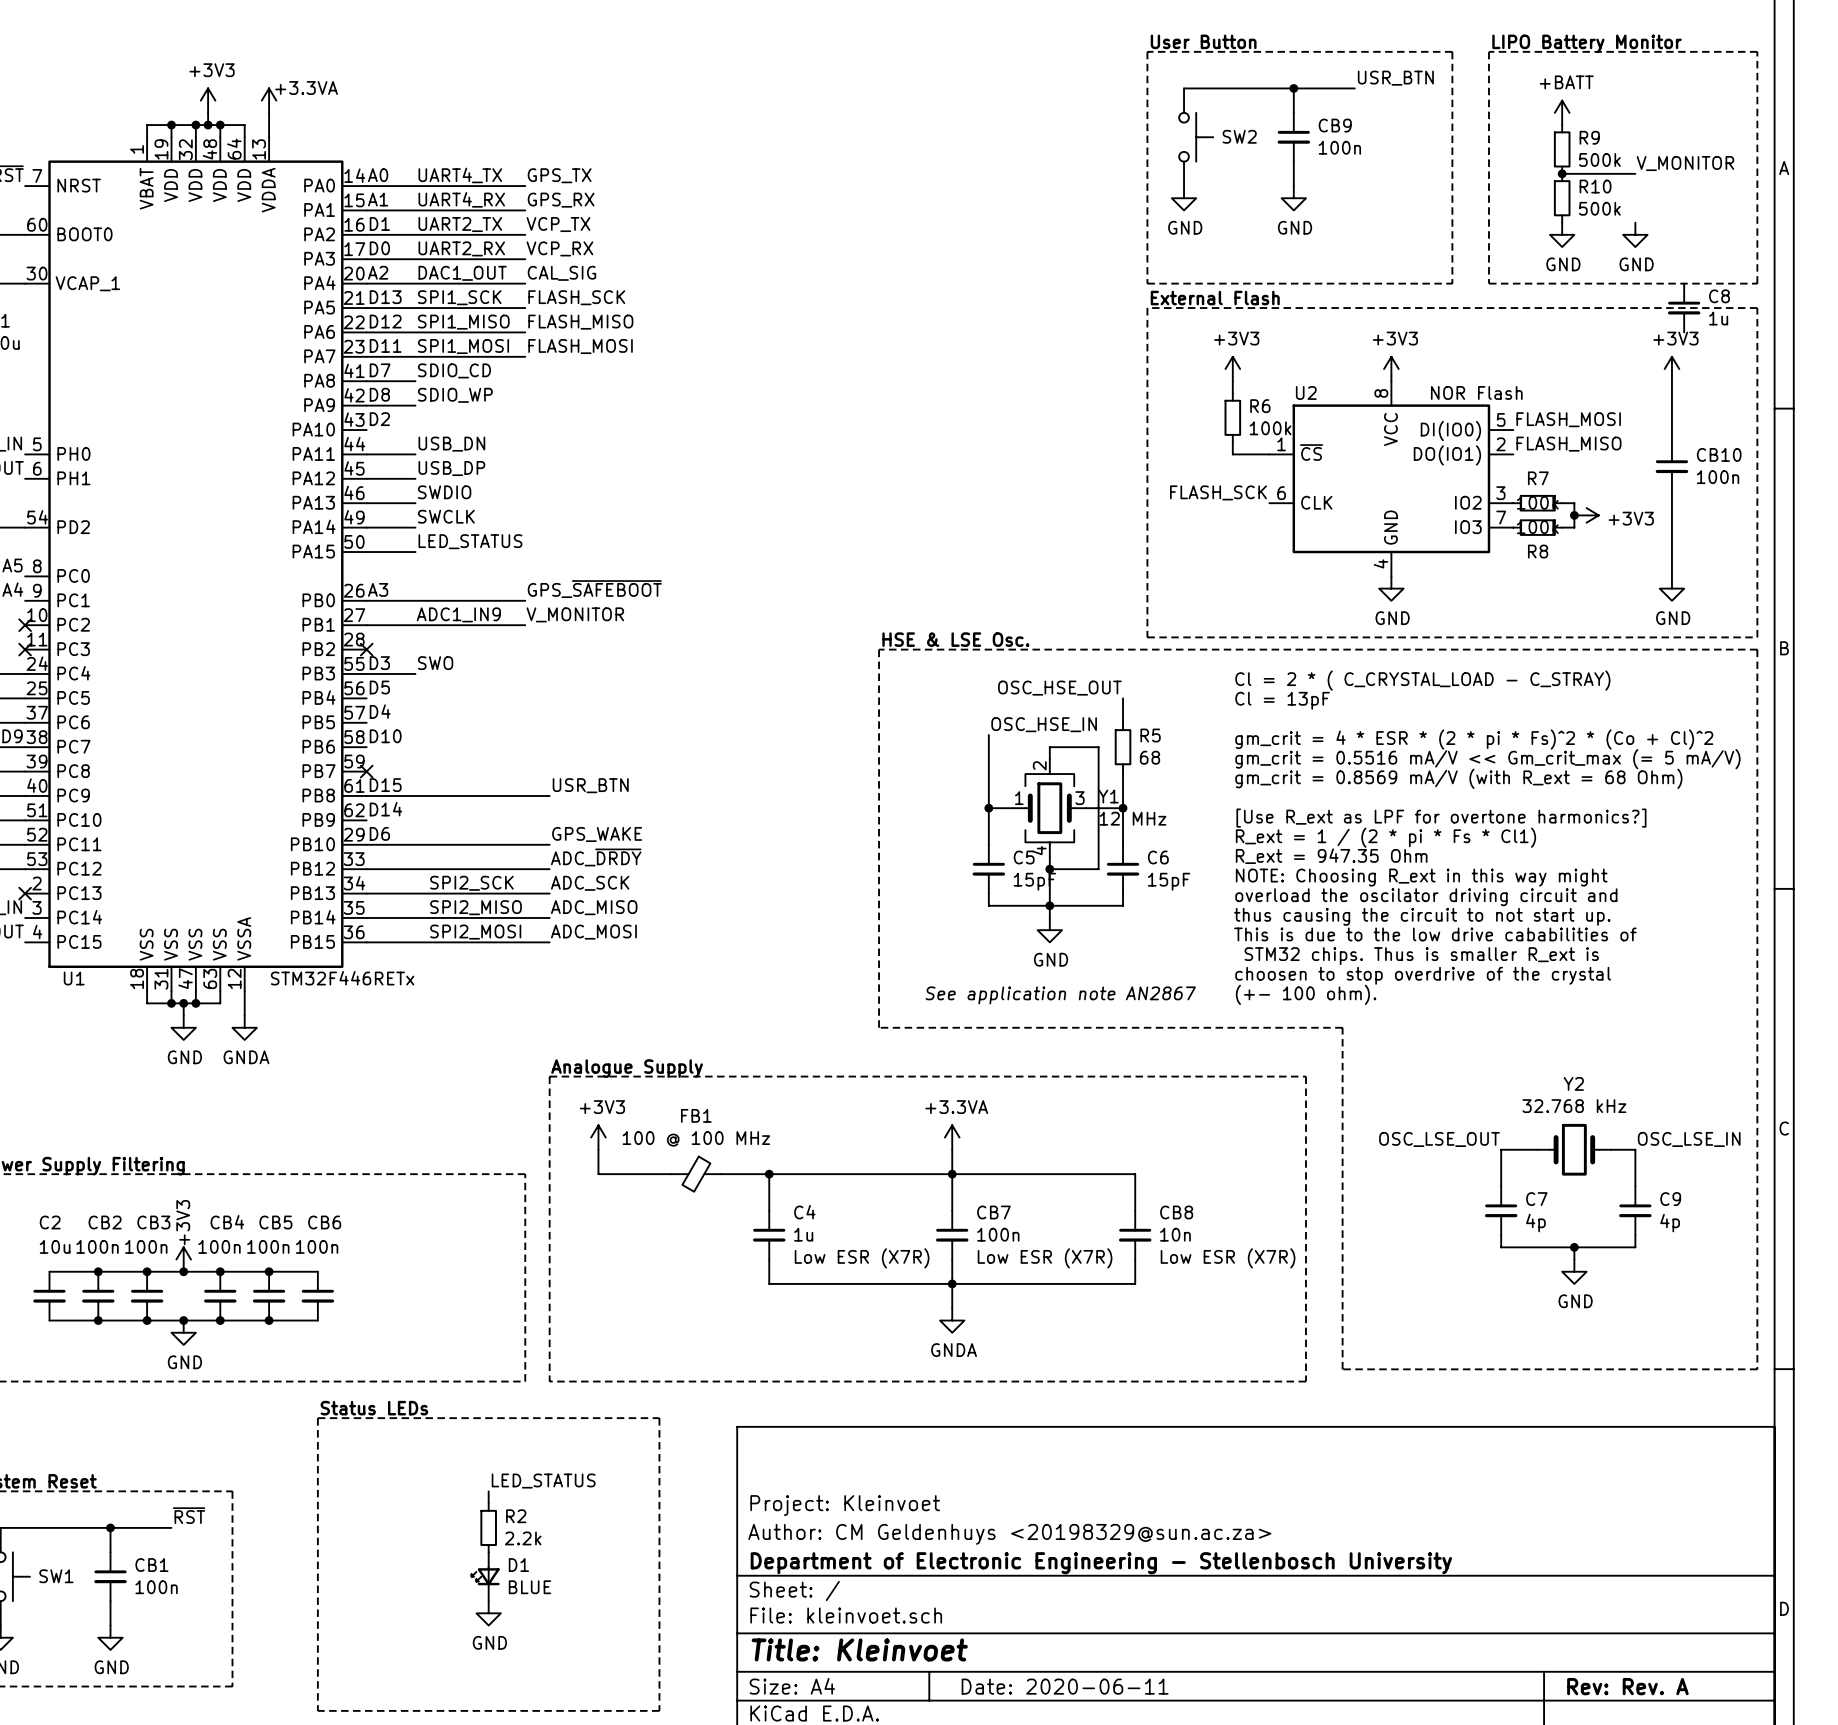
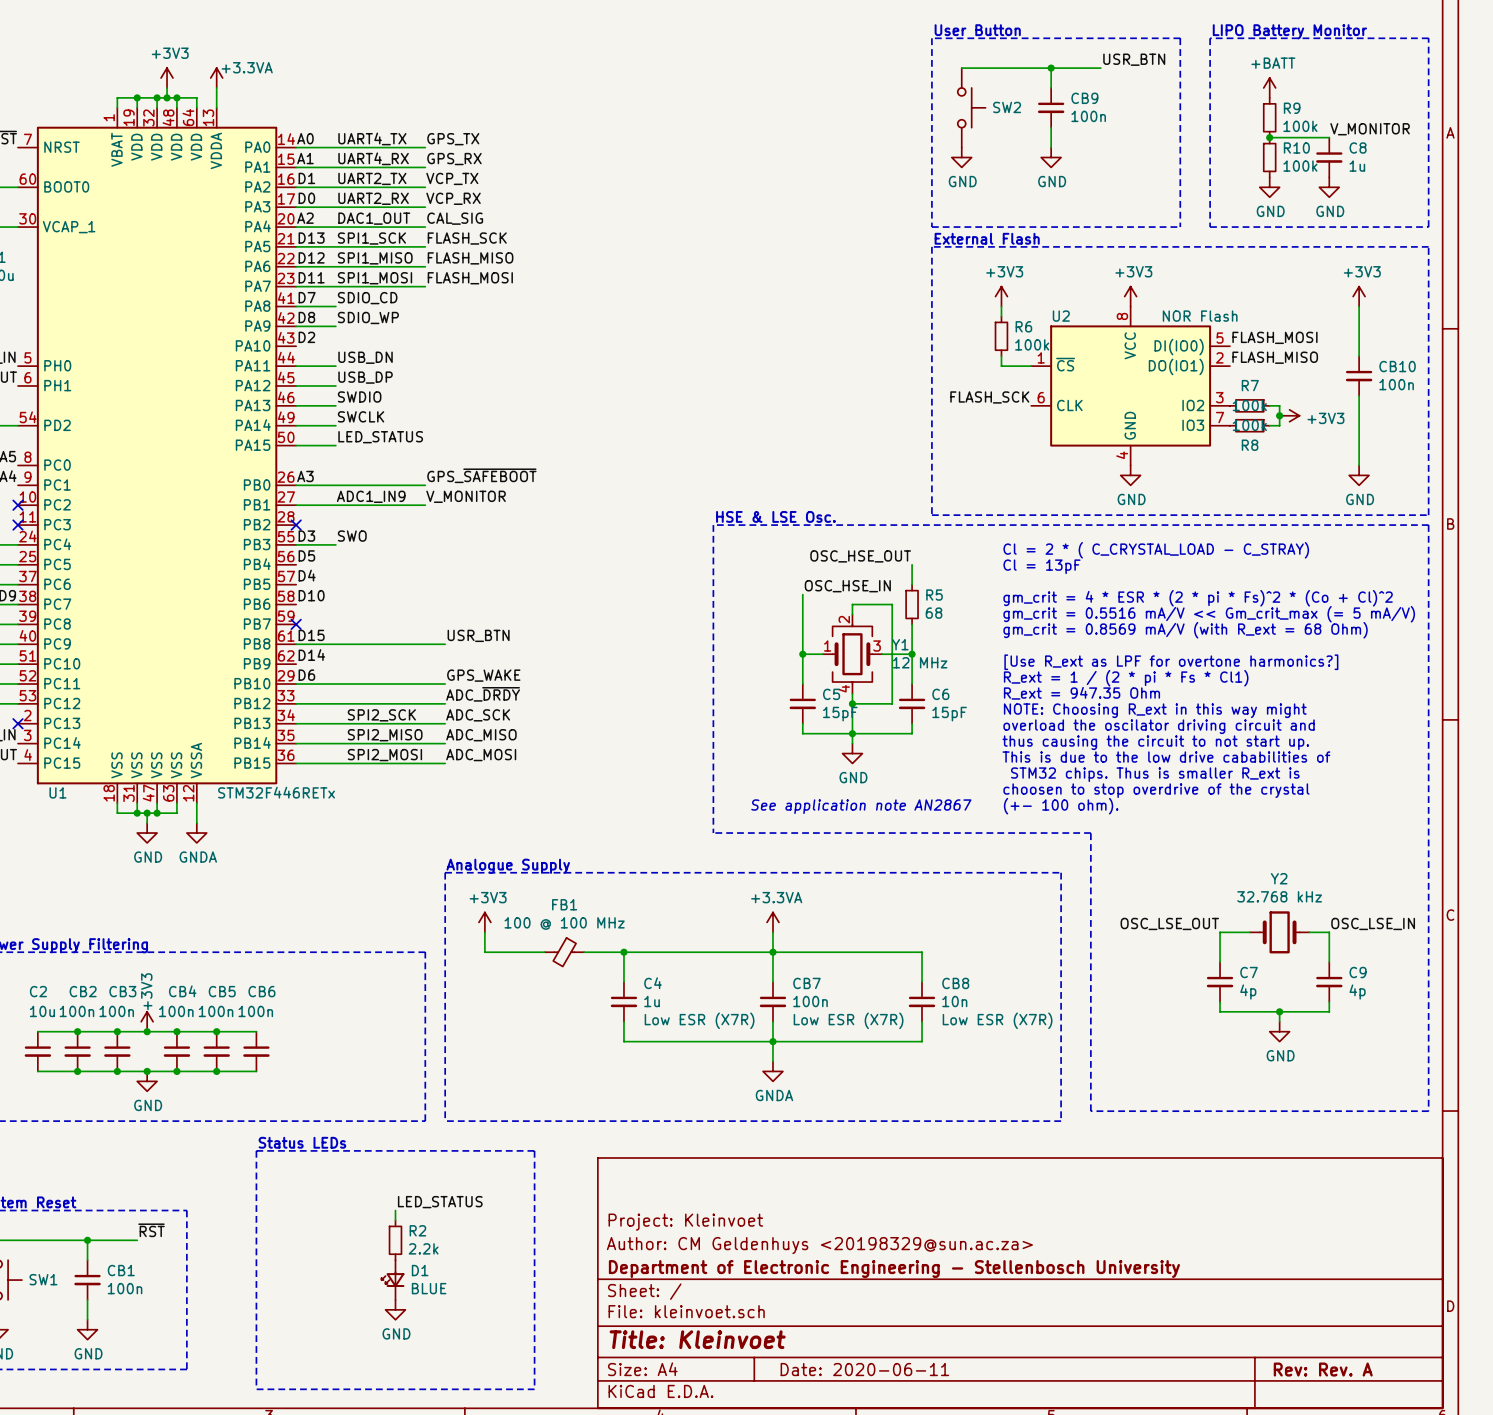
R9 value: 500k (1599, 159) -> 100k (1300, 126)
R10 value: 500k (1599, 208) -> 100k (1300, 166)
C8 position: (1684, 308) -> (1329, 157)

